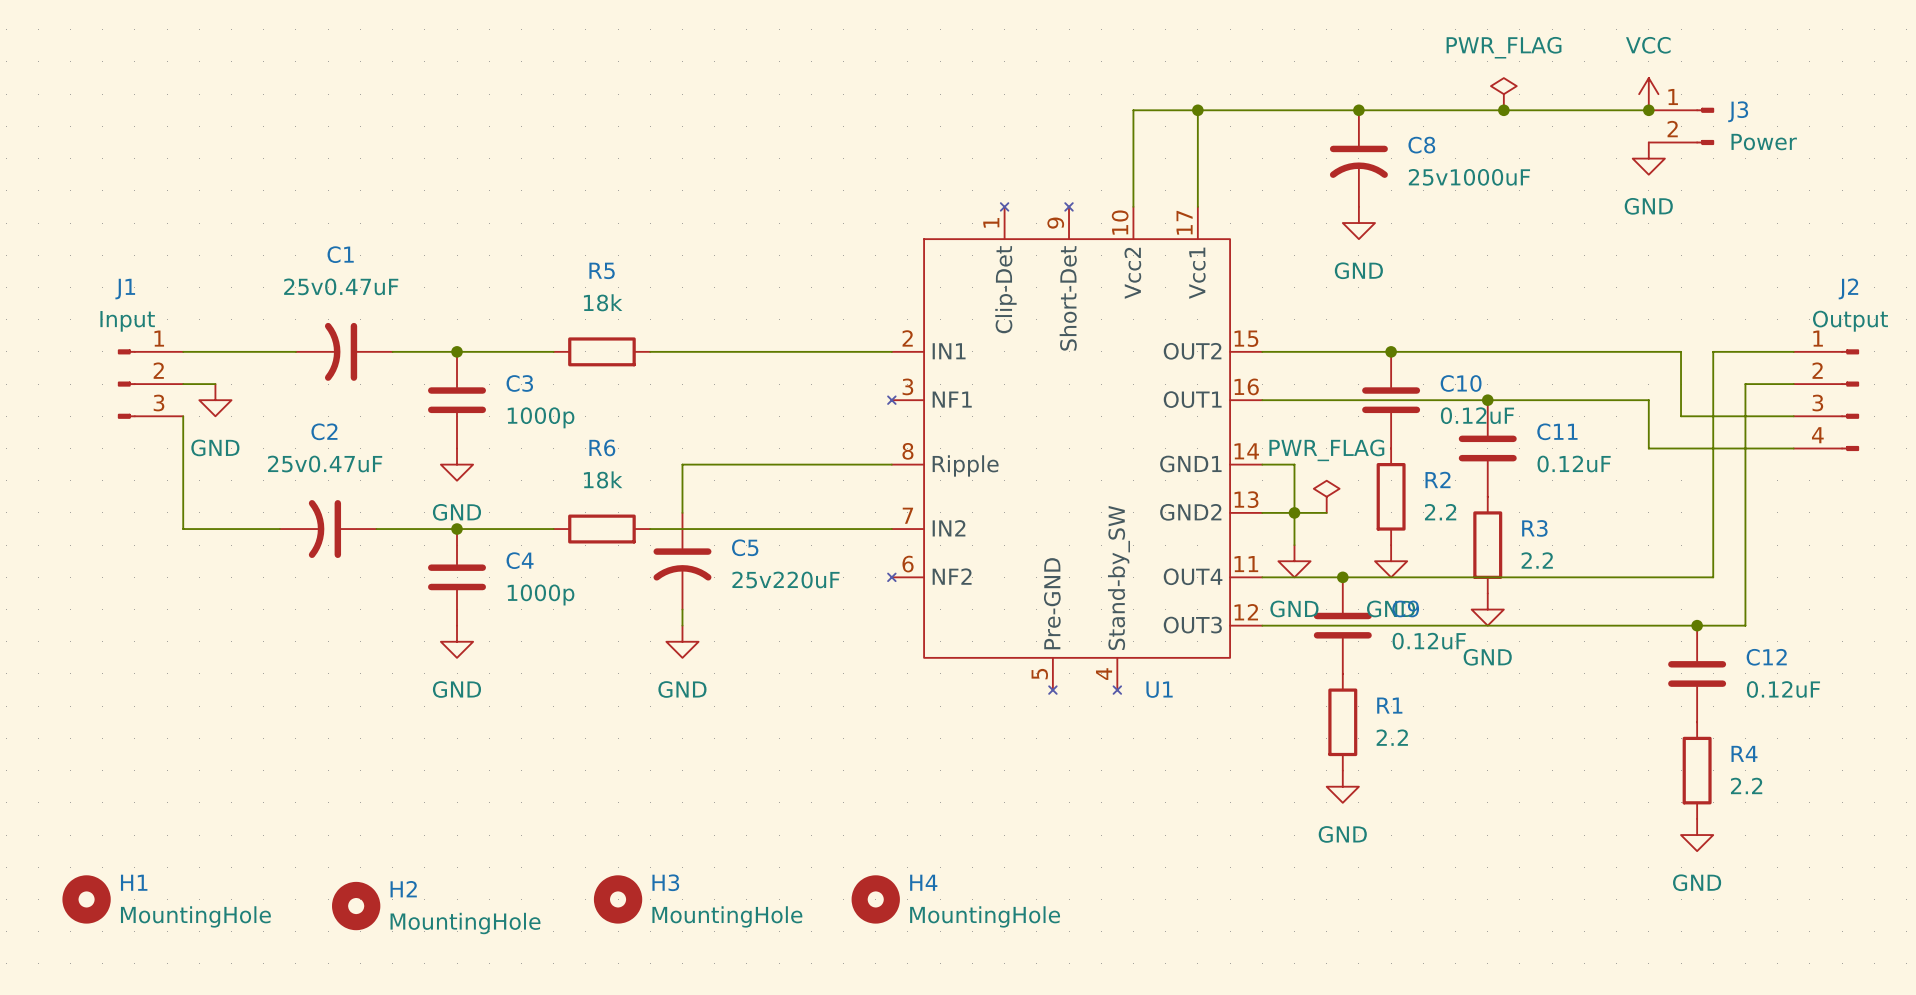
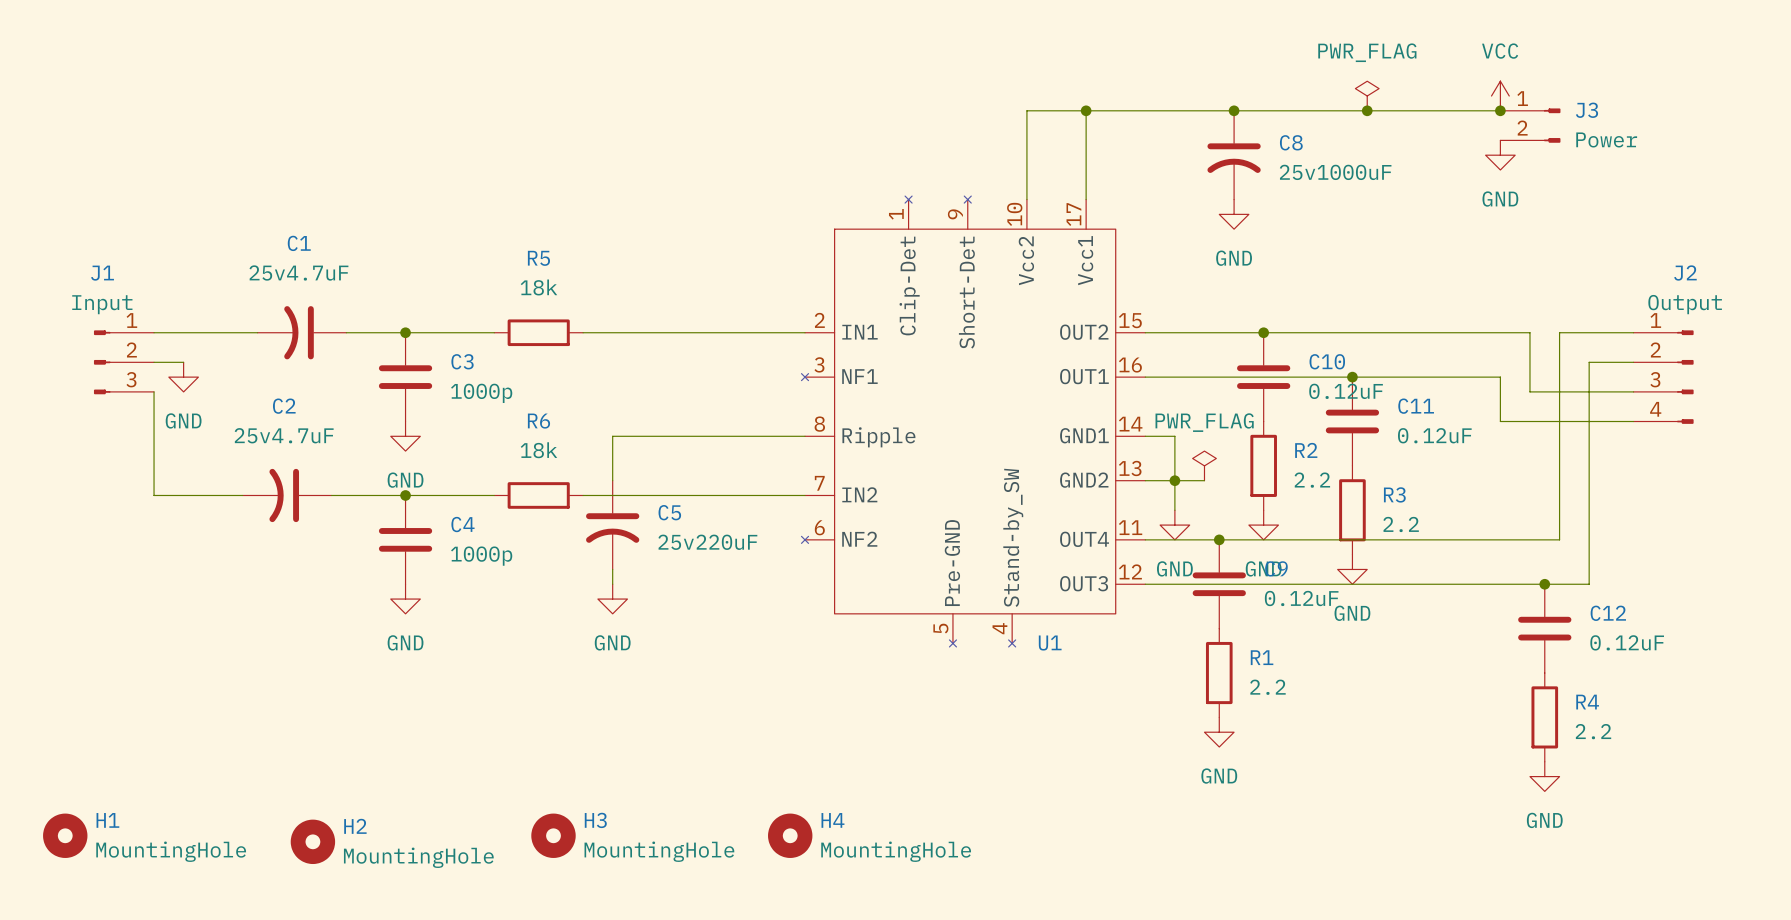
C1 value: 25v0.47uF (341, 286) -> 25v4.7uF (298, 273)
C2 value: 25v0.47uF (325, 464) -> 25v4.7uF (284, 435)

